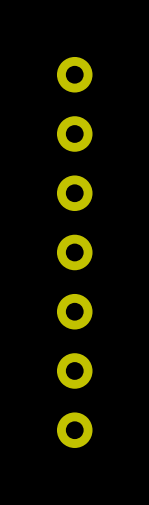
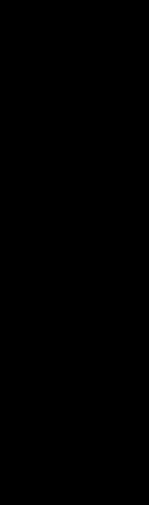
part: (74, 252) -> none

